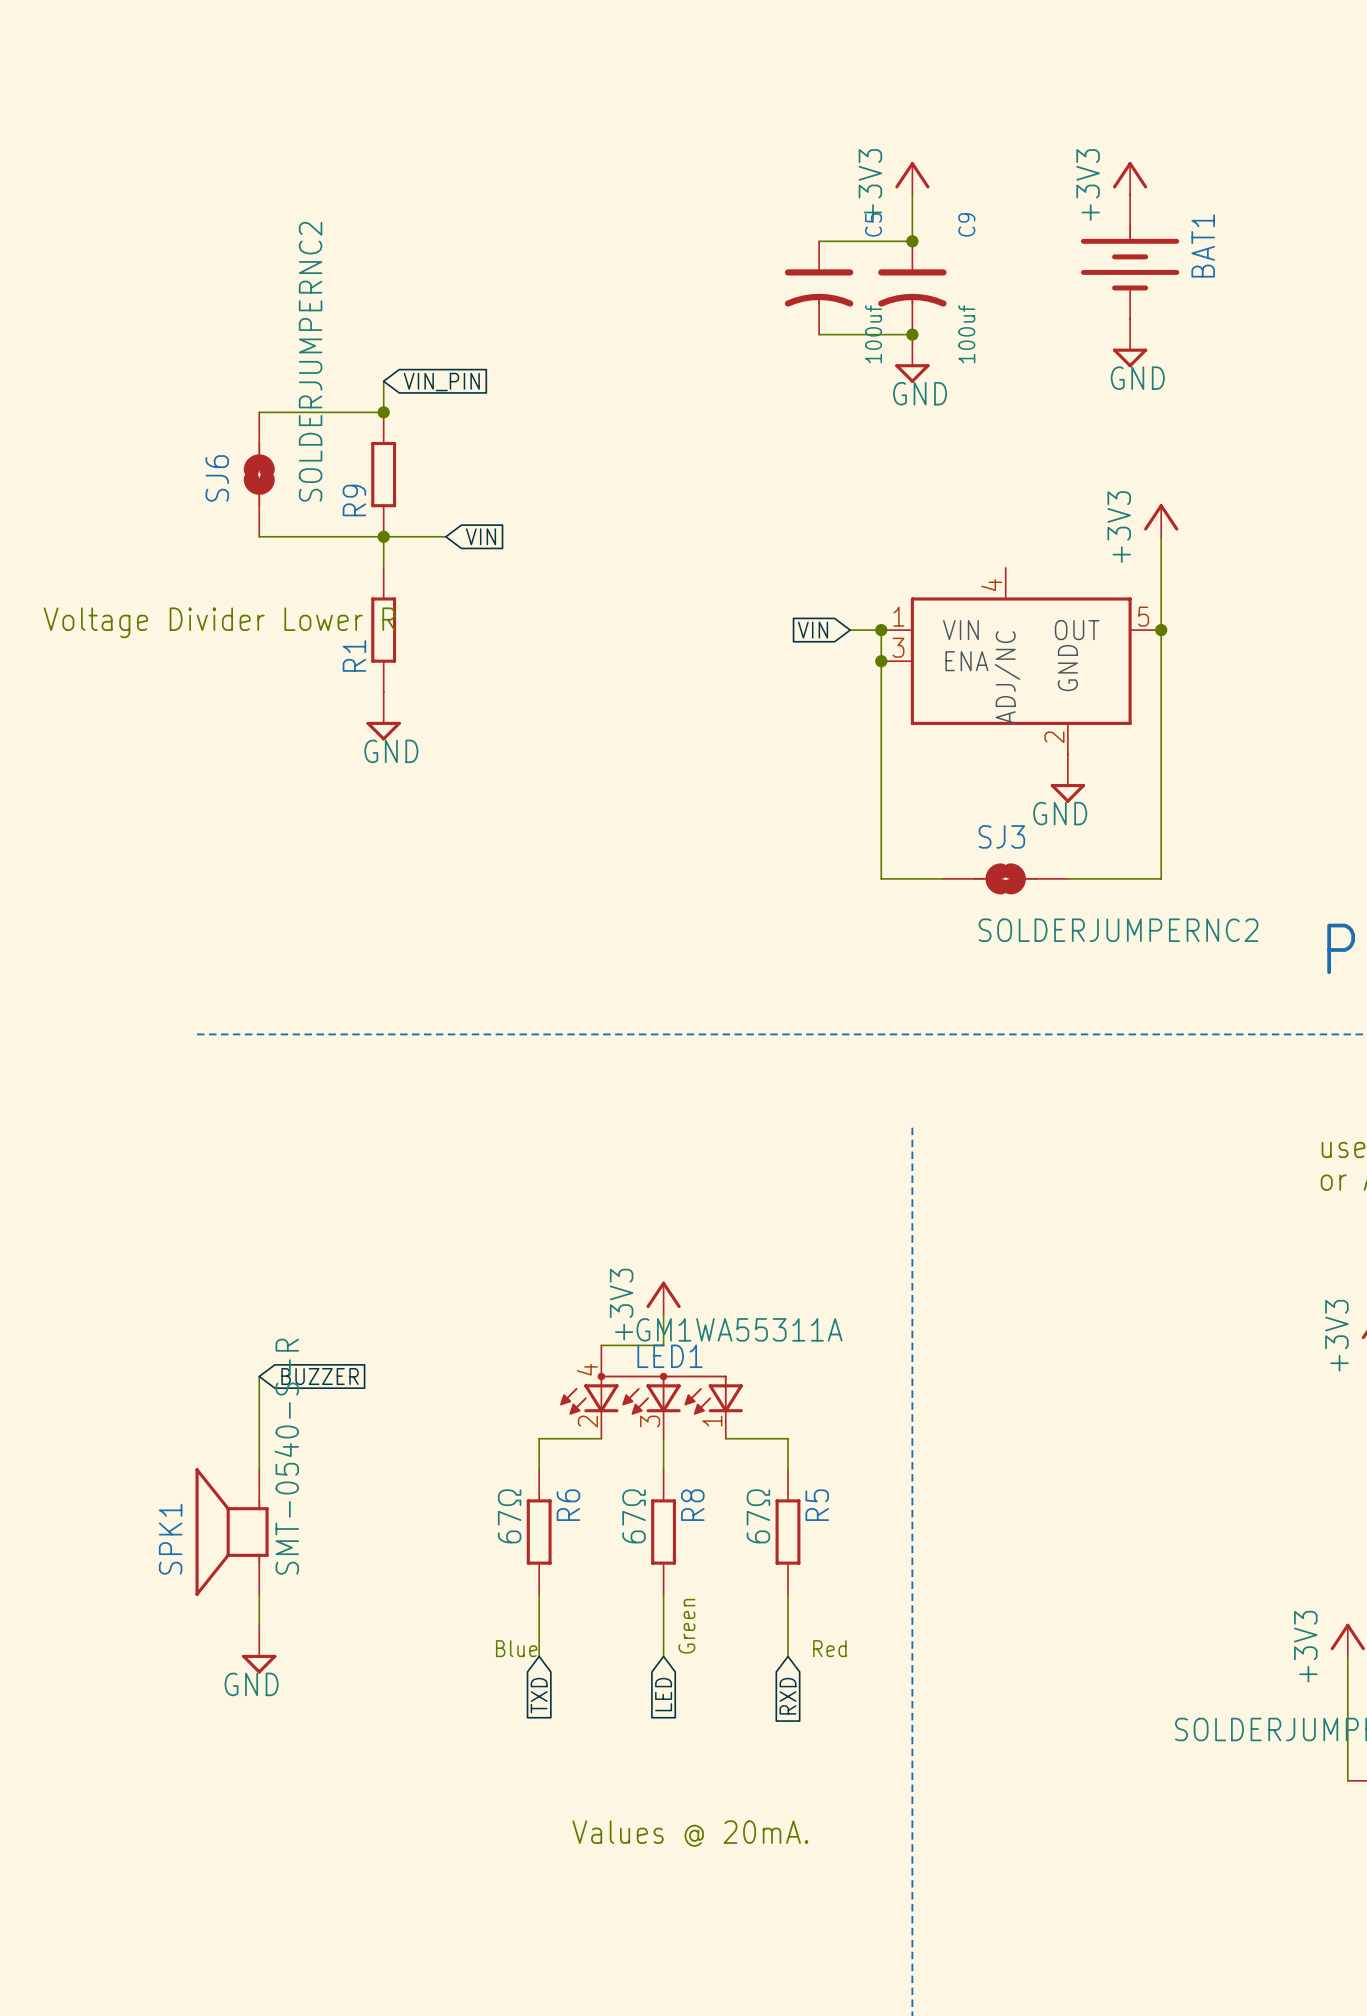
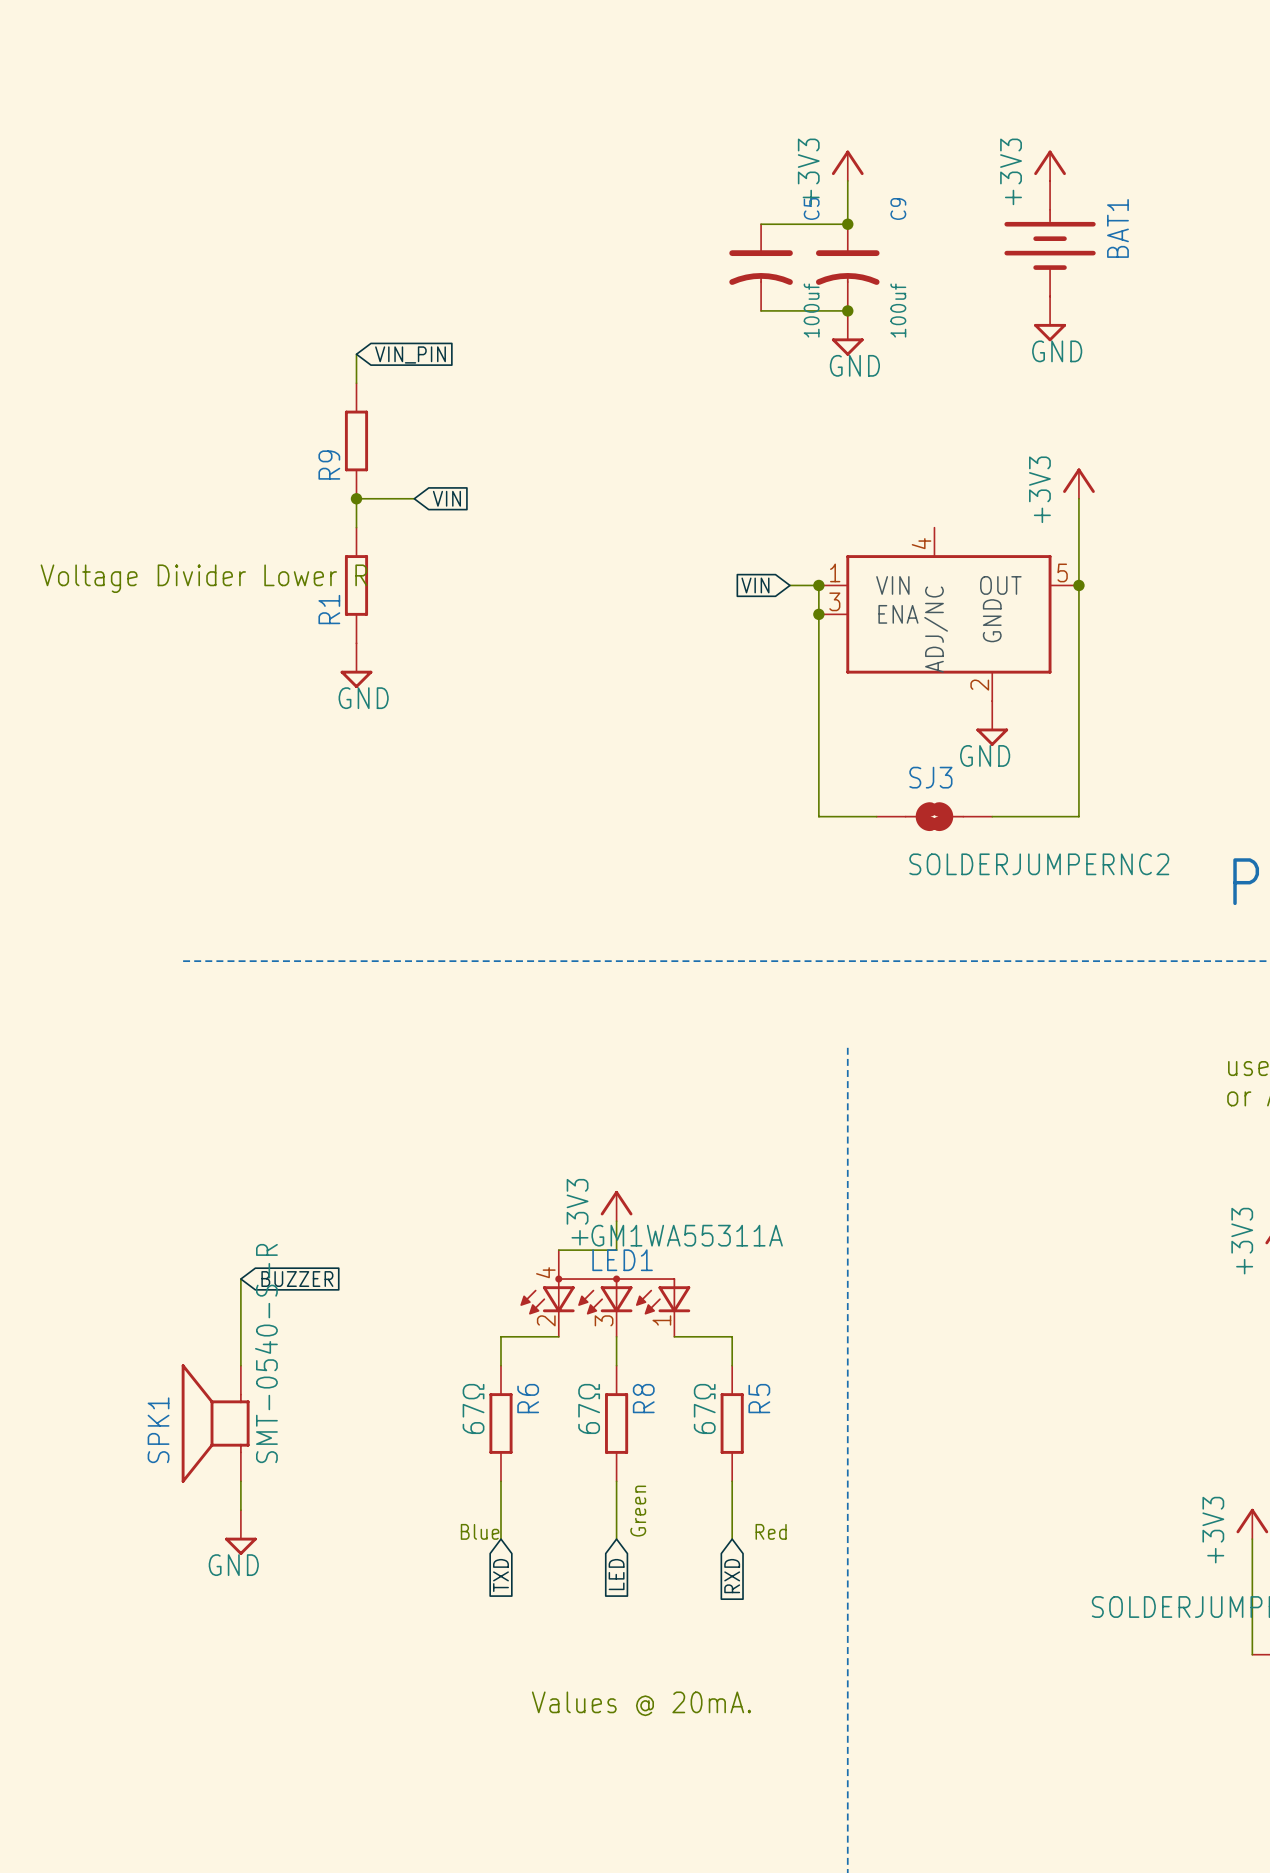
wire: (259, 412) (383, 412) -> none
junction: (383, 412) -> none
SJ6: SOLDERJUMPERNC2 (259, 474) -> none
wire: (259, 536) (383, 536) -> none

